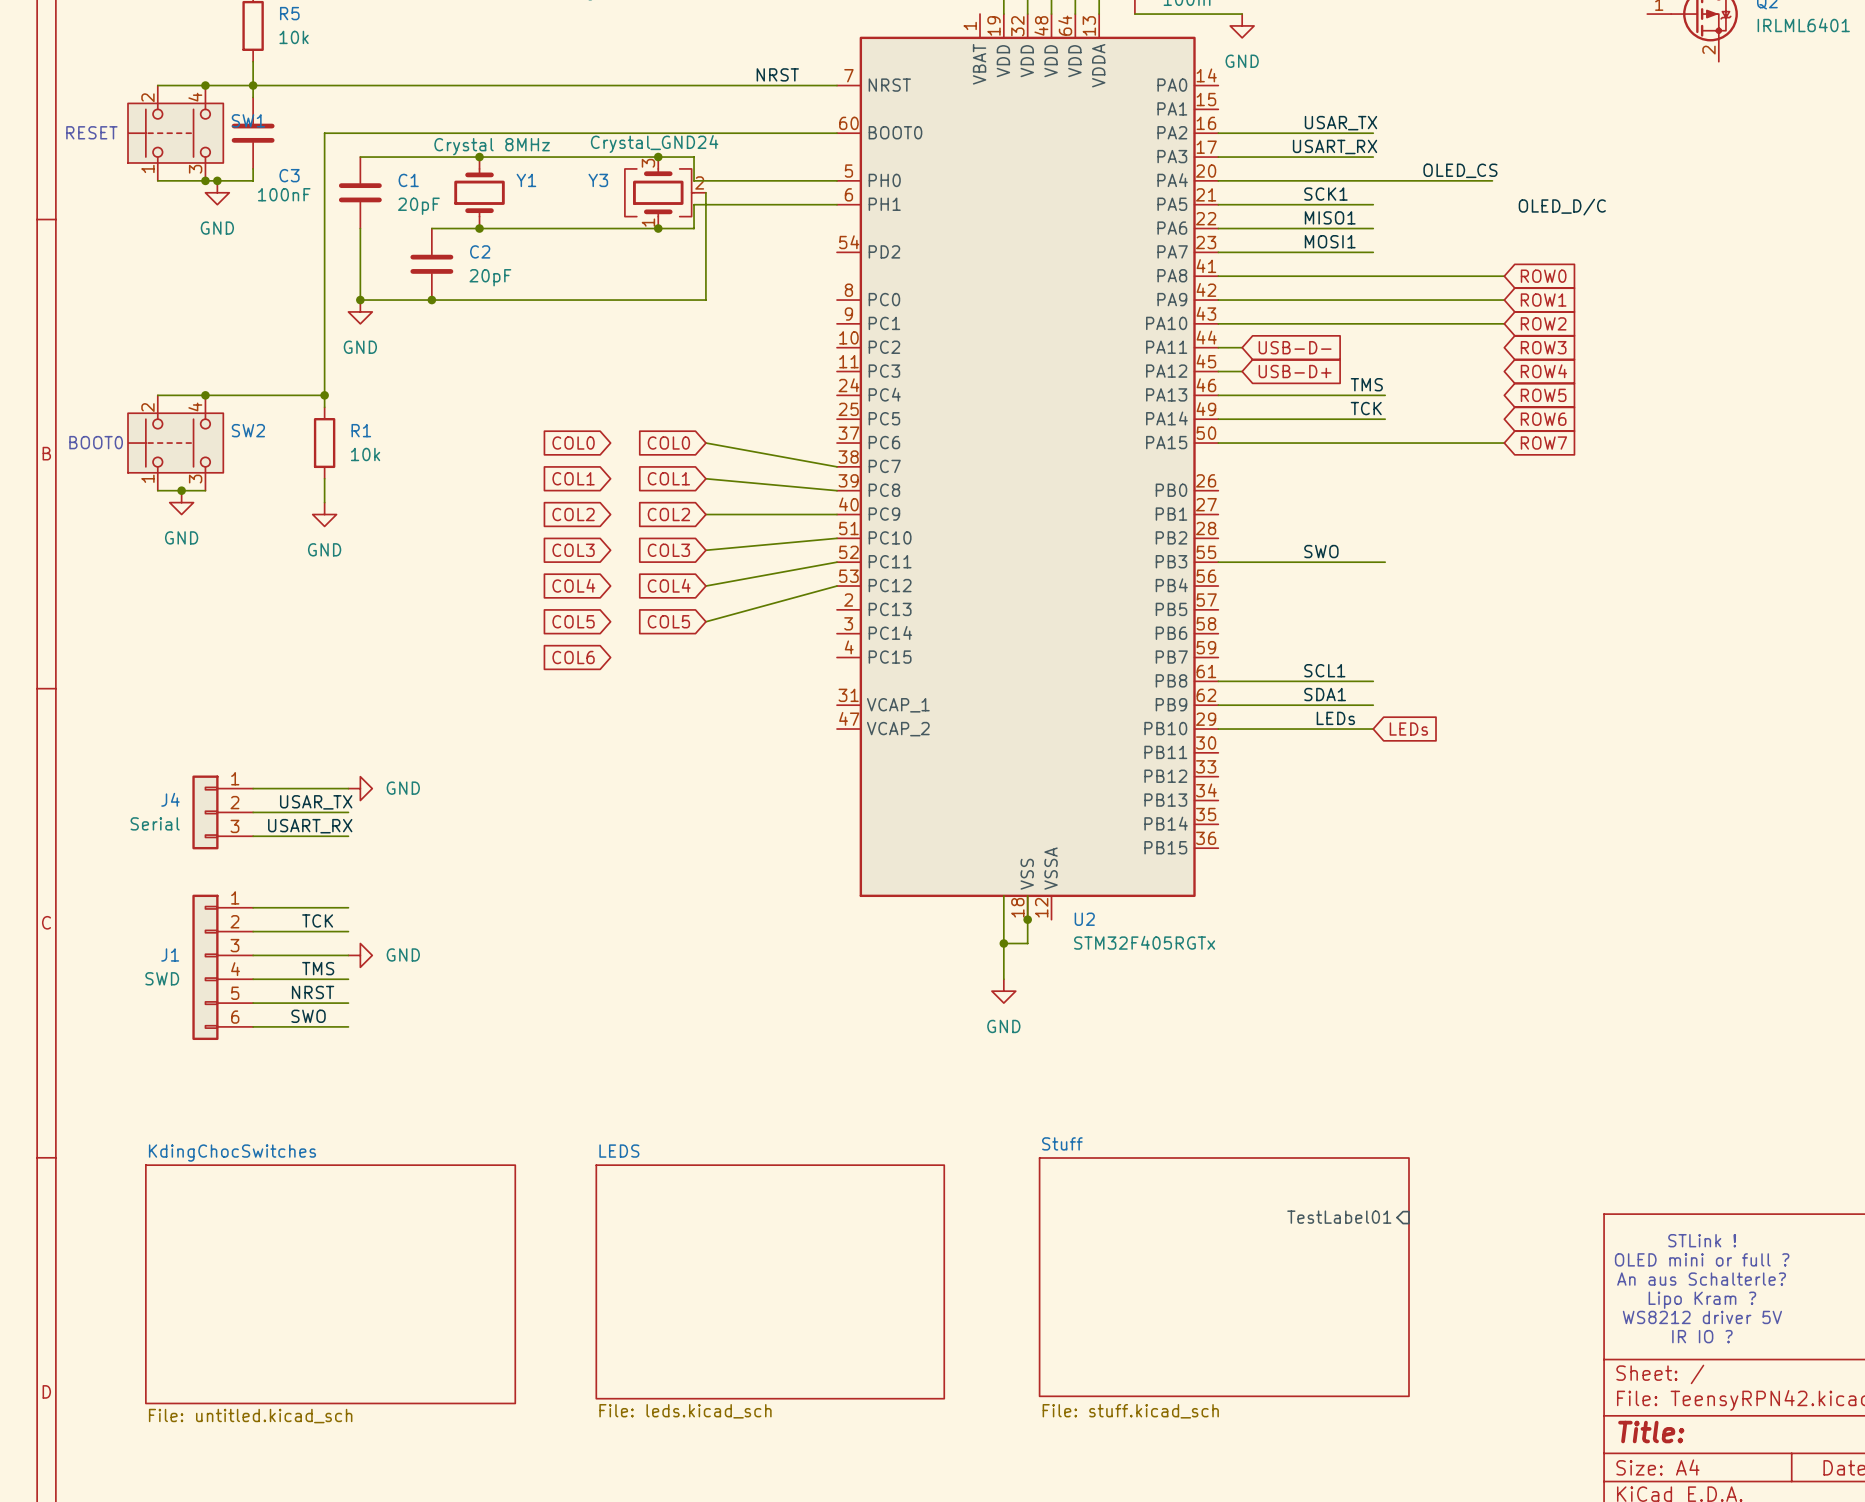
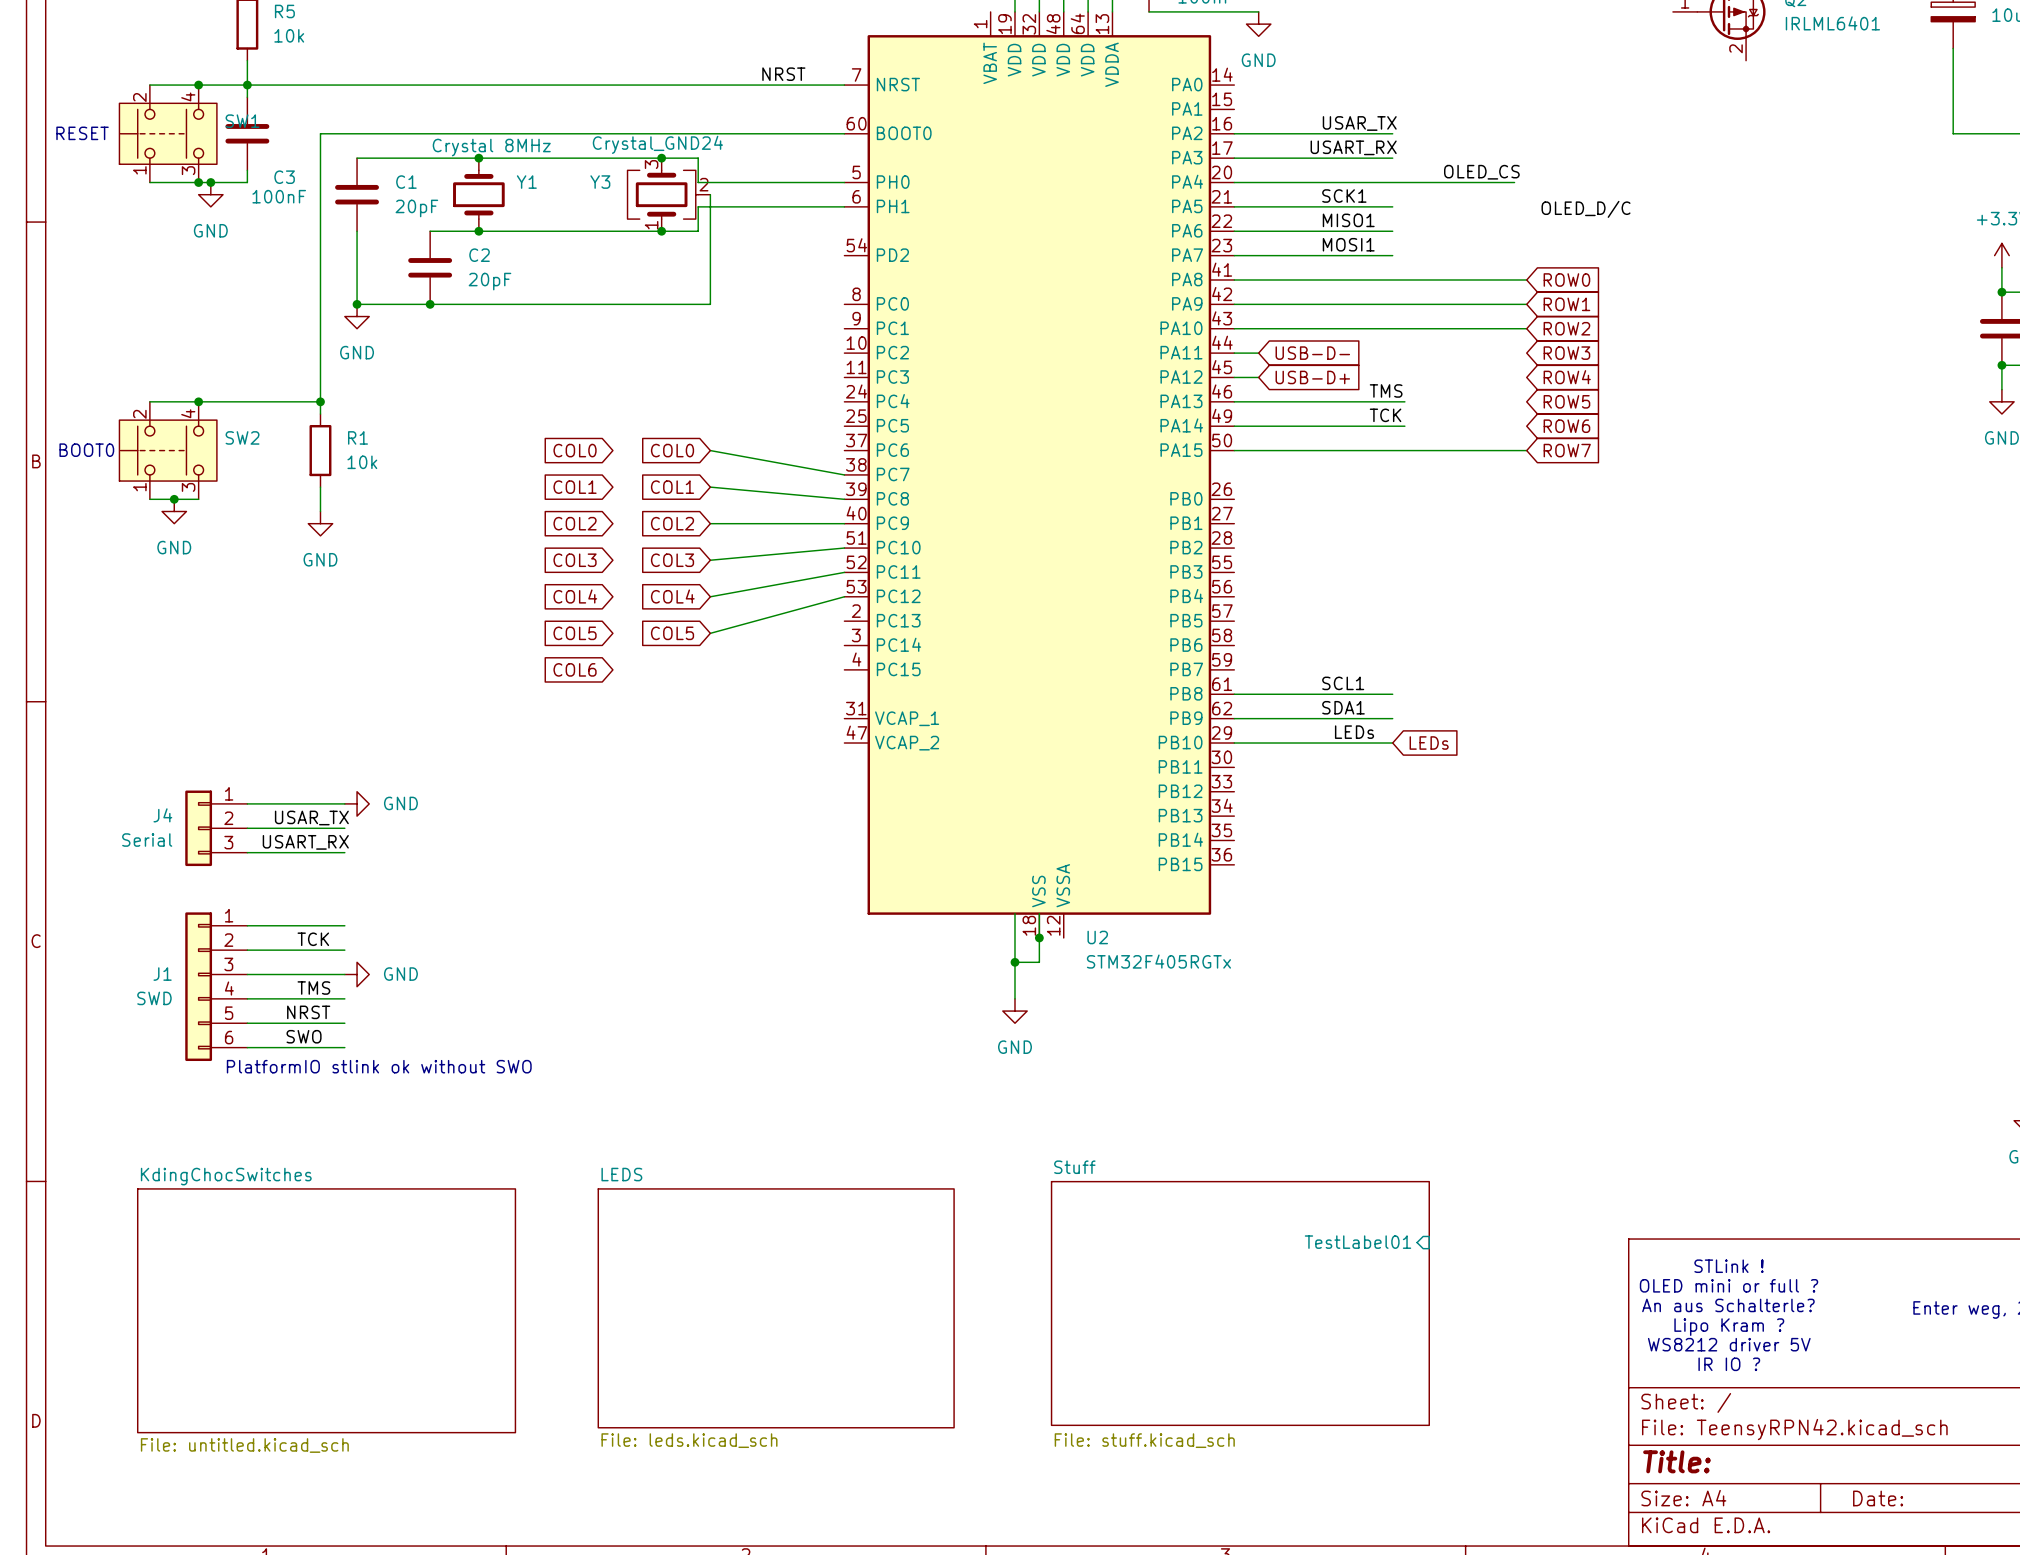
label: SWO (1321, 551) -> none
wire: (1218, 562) (1385, 562) -> none
text: none -> PlatformIO stlink ok without SWO (379, 1066)

